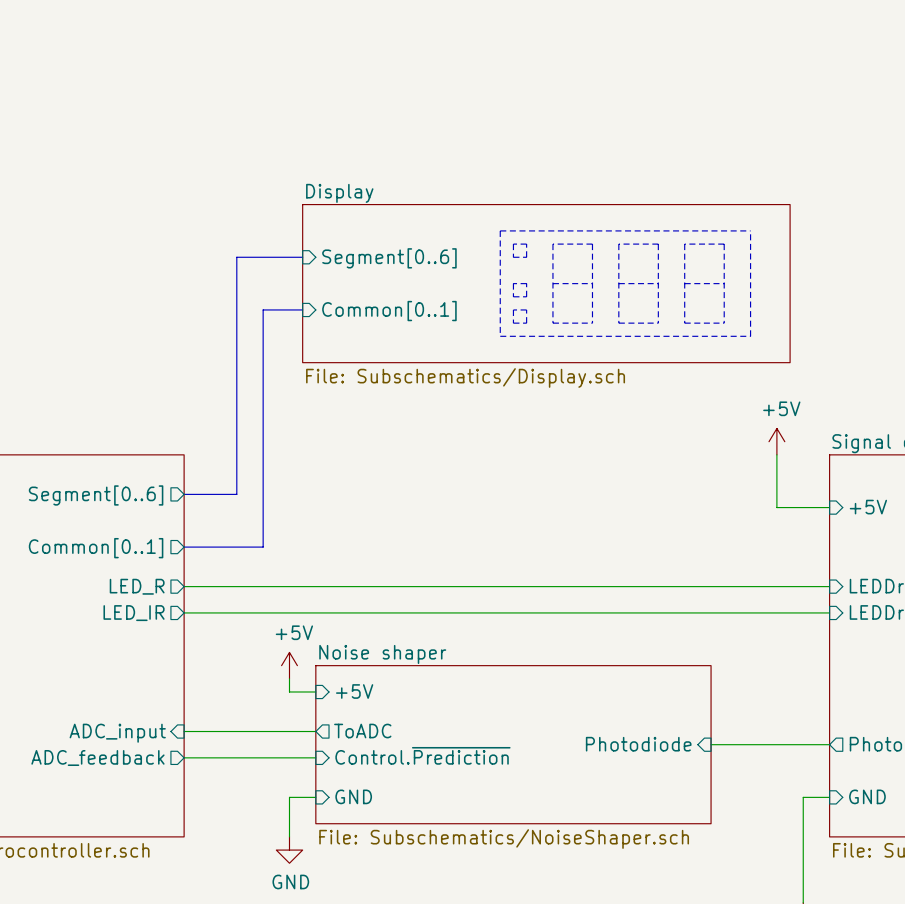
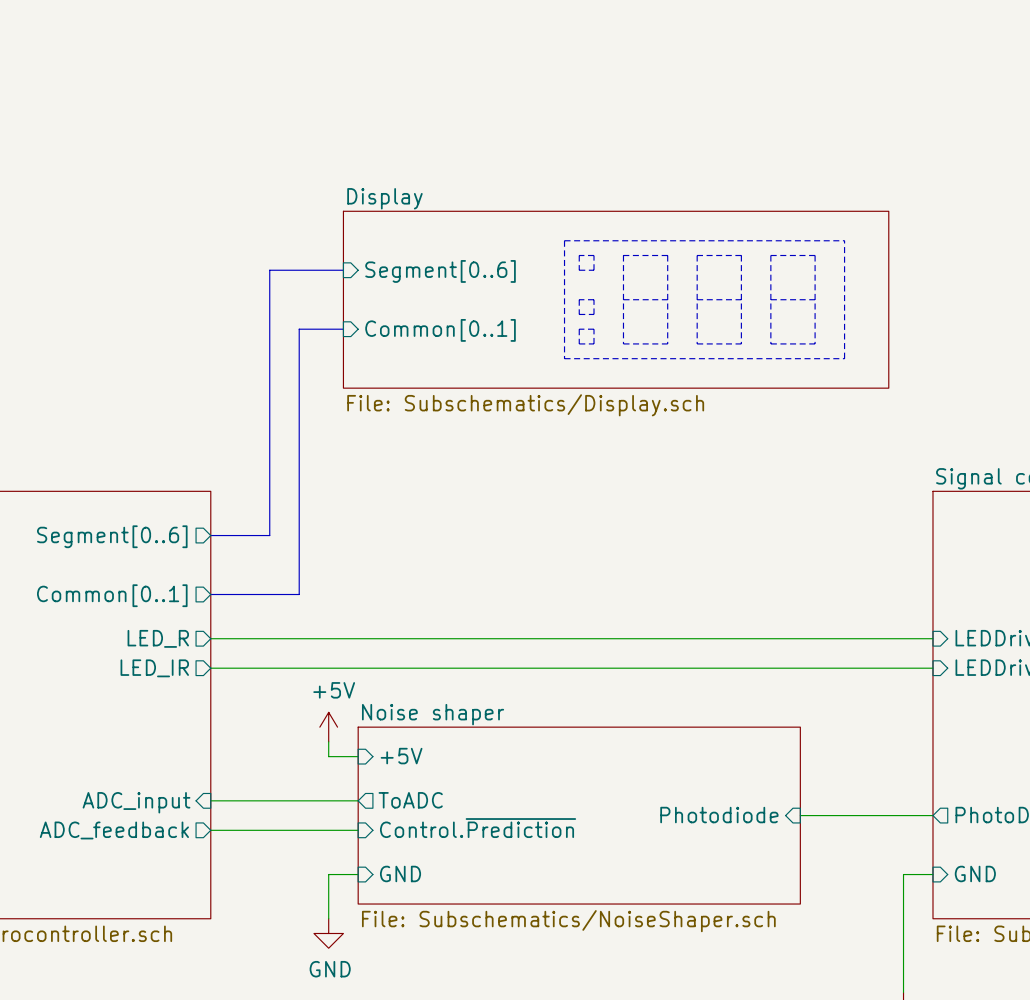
power symbol: +5V (776, 441) -> none
wire: (776, 454) (776, 507) (829, 507) -> none
sheet pin: +5V (868, 507) -> none

